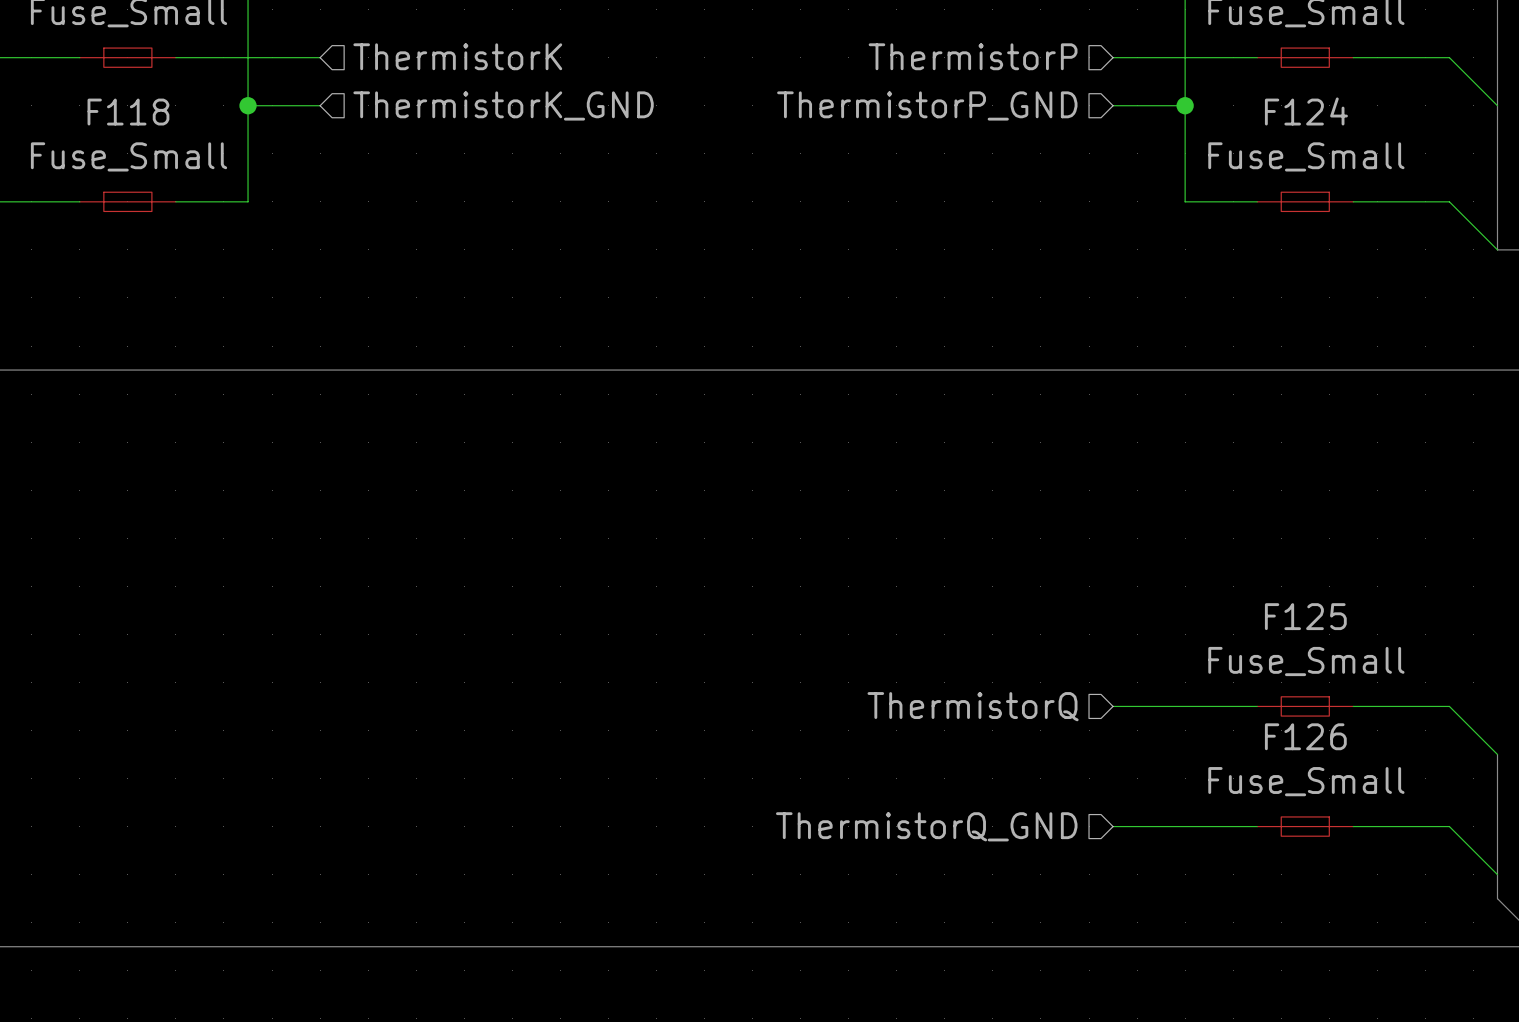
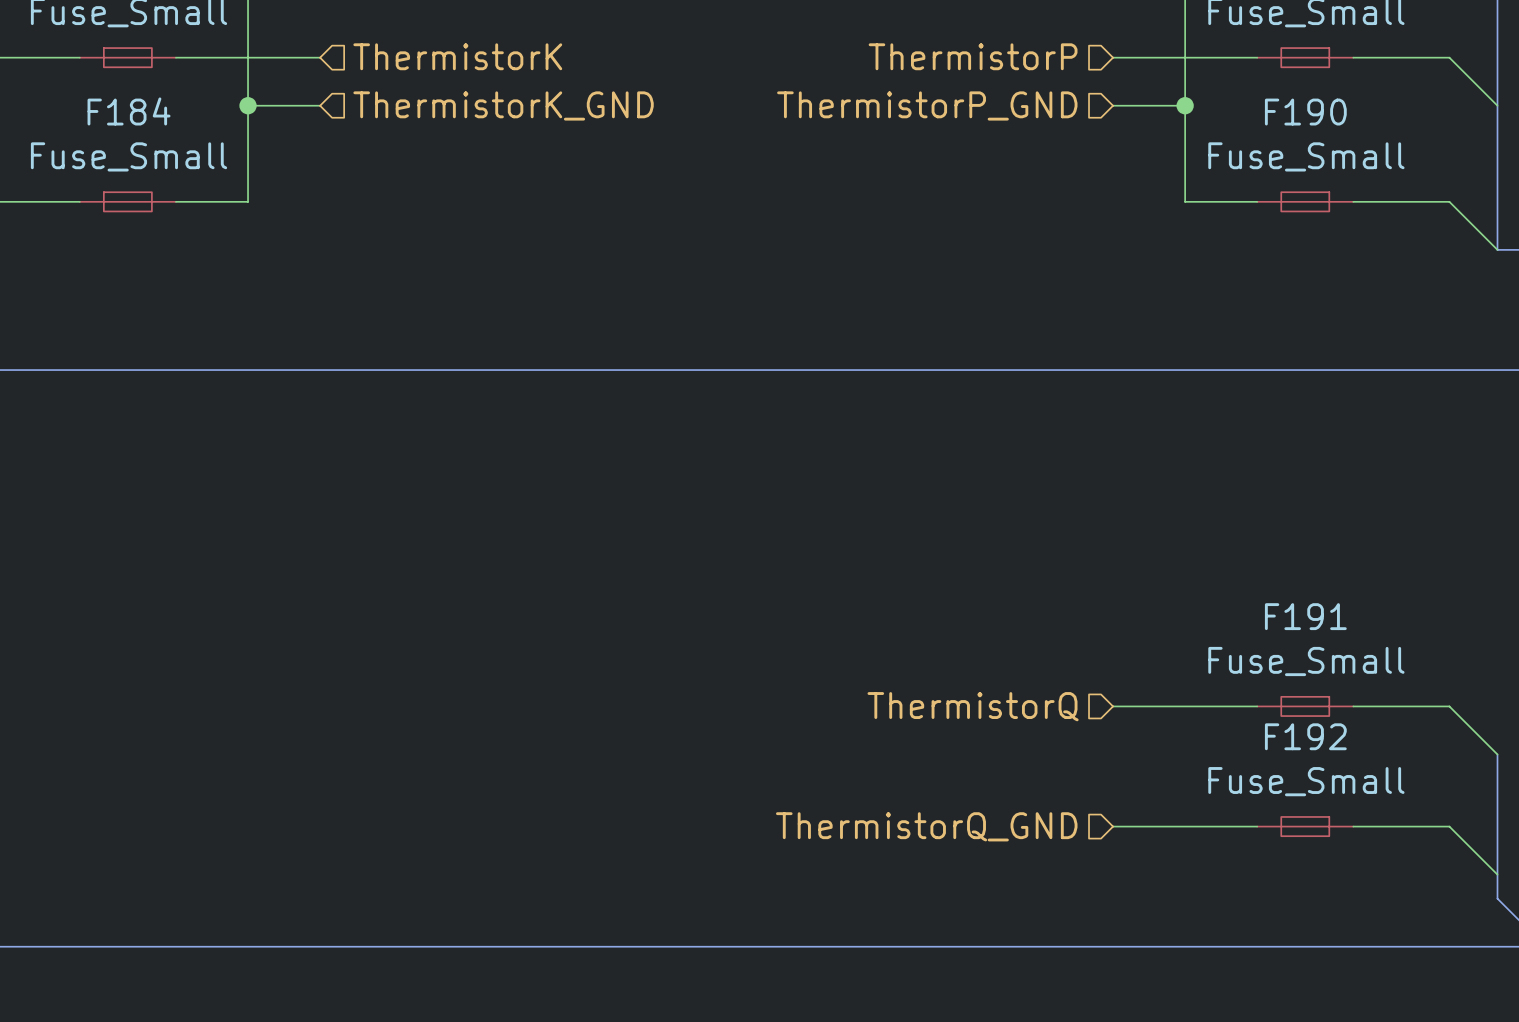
F124 name: F124 (1306, 111) -> F190 (1305, 112)
F118 name: F118 (128, 112) -> F184 (129, 111)
F125 name: F125 (1305, 616) -> F191 (1305, 616)
F126 name: F126 (1305, 736) -> F192 (1305, 736)

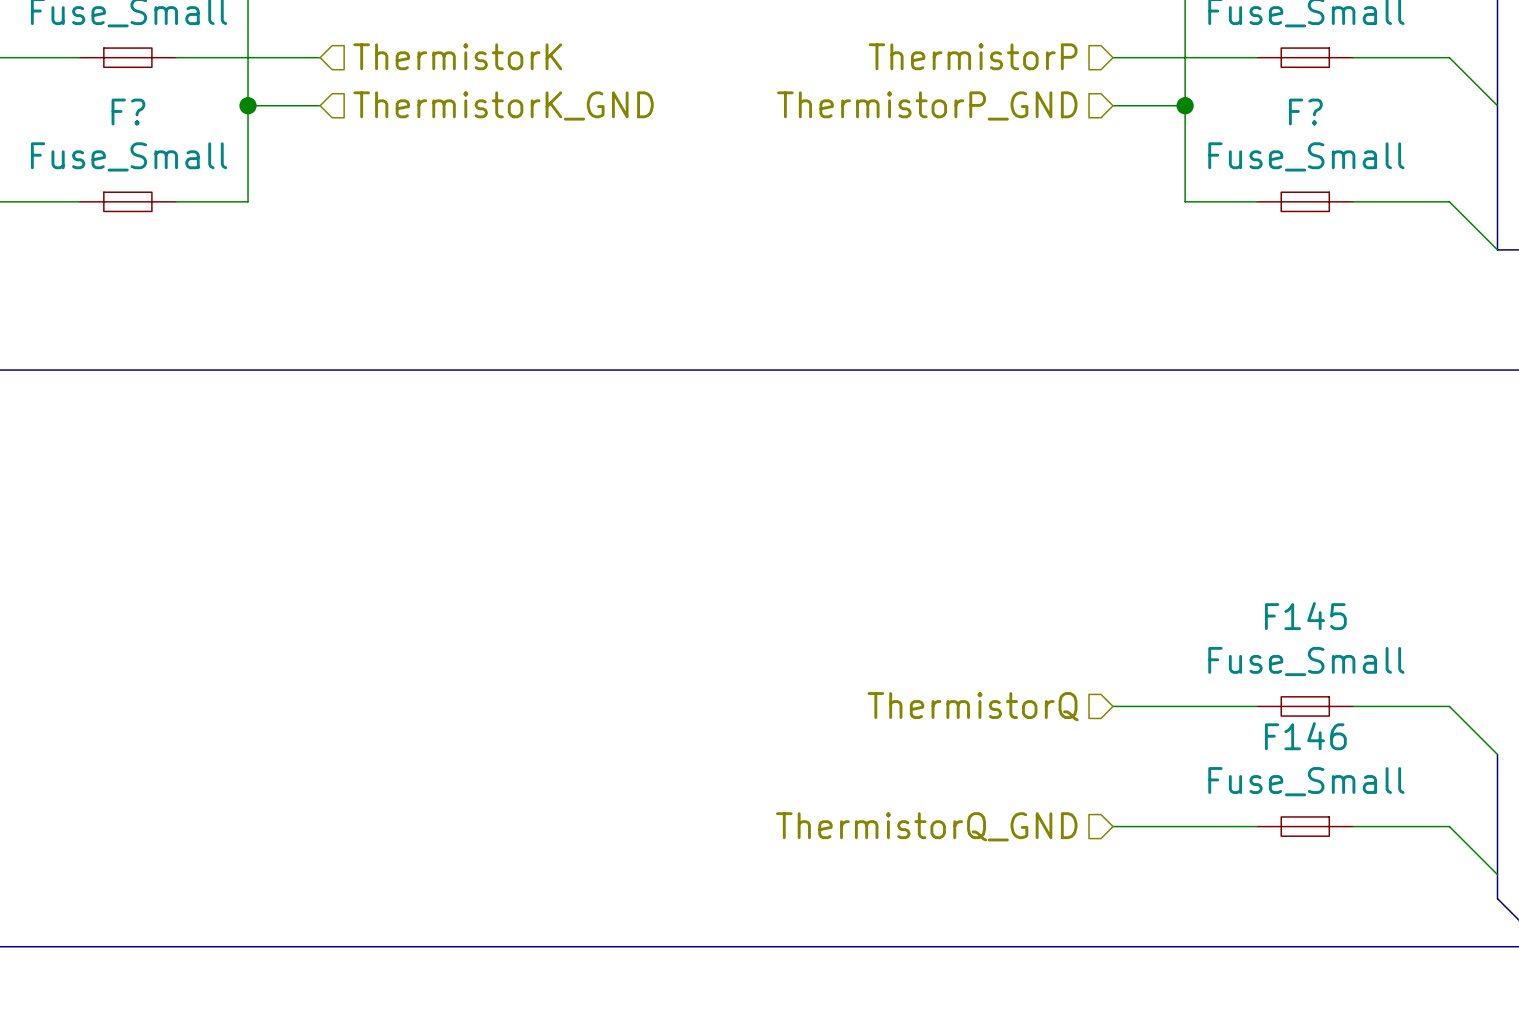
F184 name: F184 (129, 111) -> F? (128, 112)
F190 name: F190 (1305, 112) -> F? (1305, 112)
F191 name: F191 (1305, 616) -> F145 (1305, 616)
F192 name: F192 (1305, 736) -> F146 (1305, 736)

